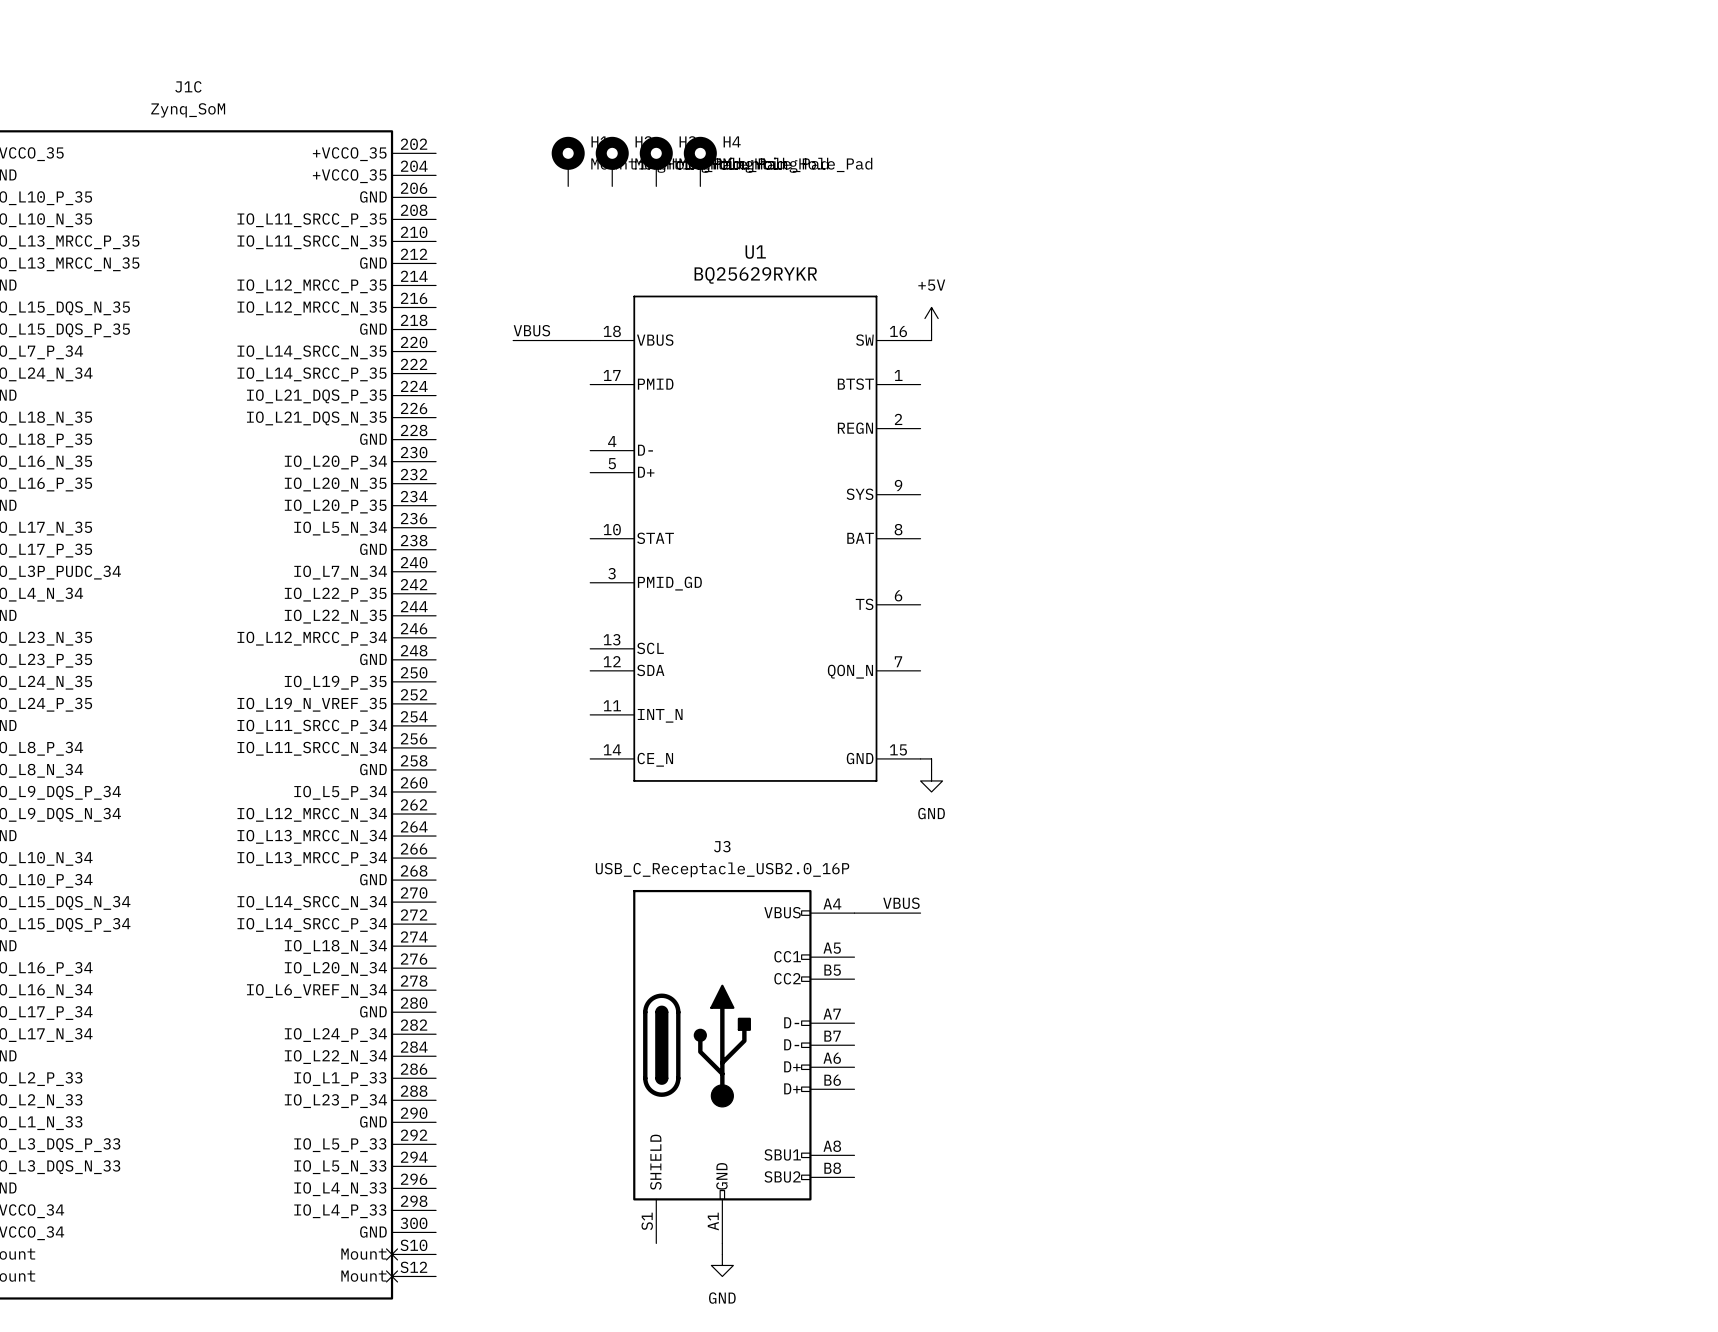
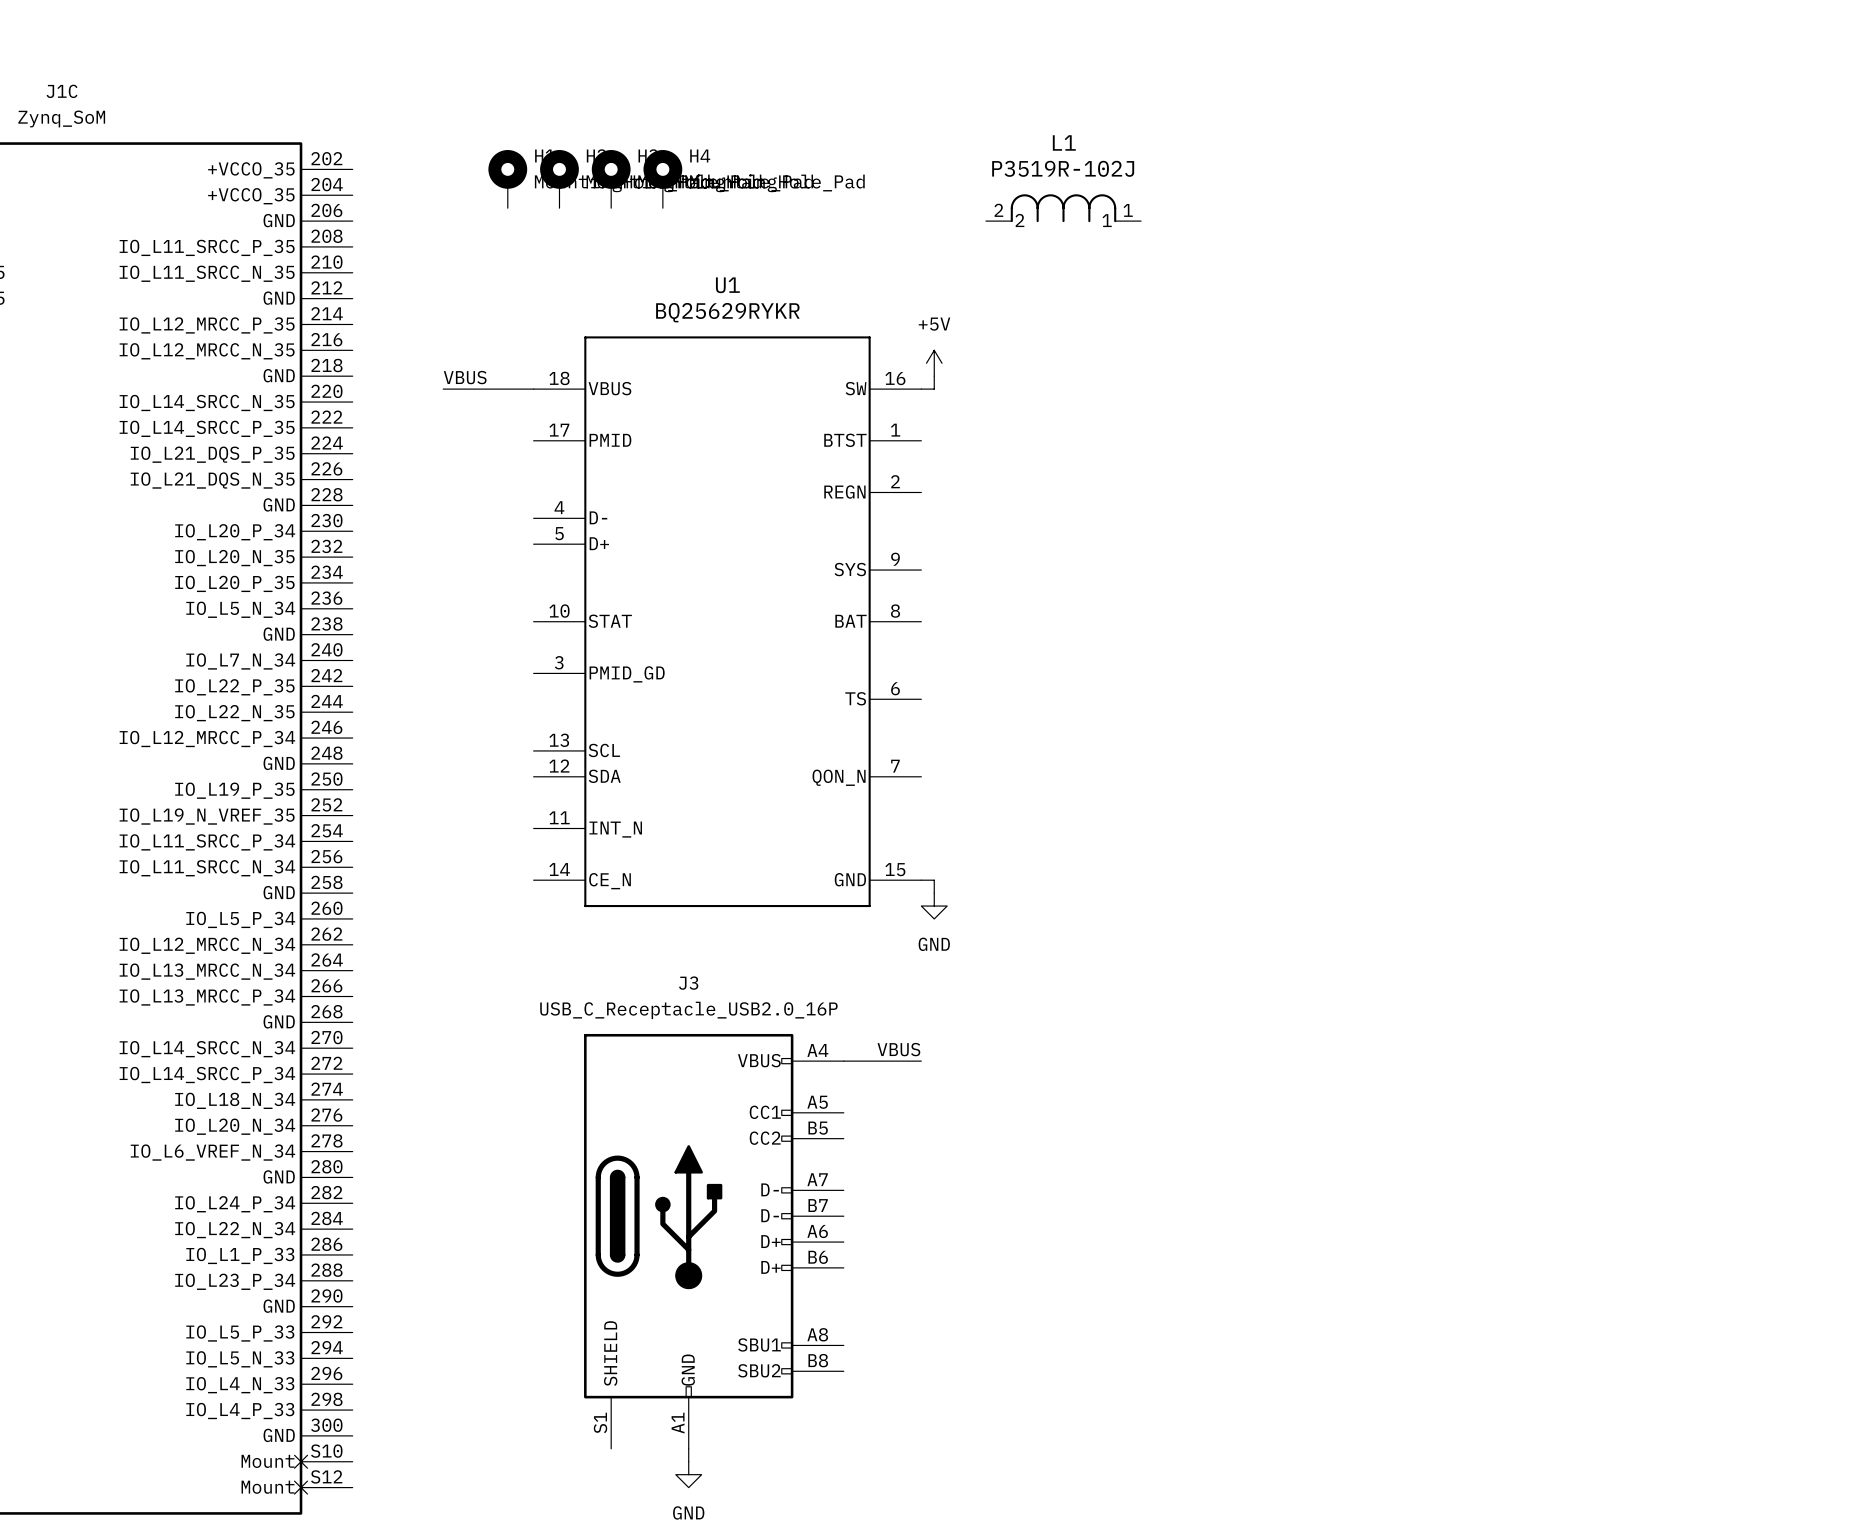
L1: none -> P3519R-102J (1063, 208)

